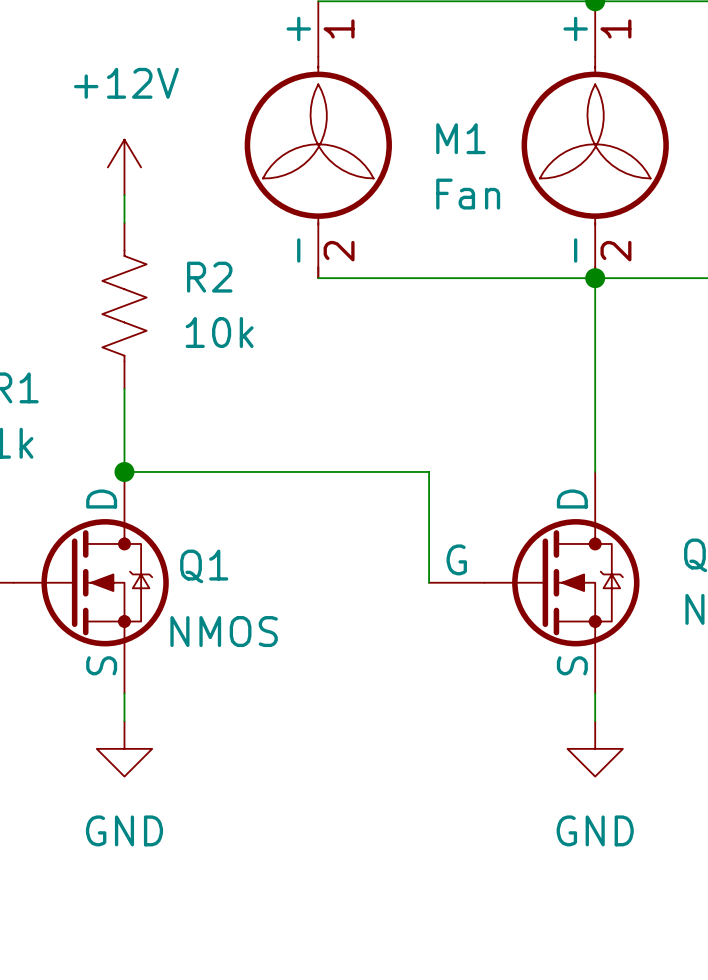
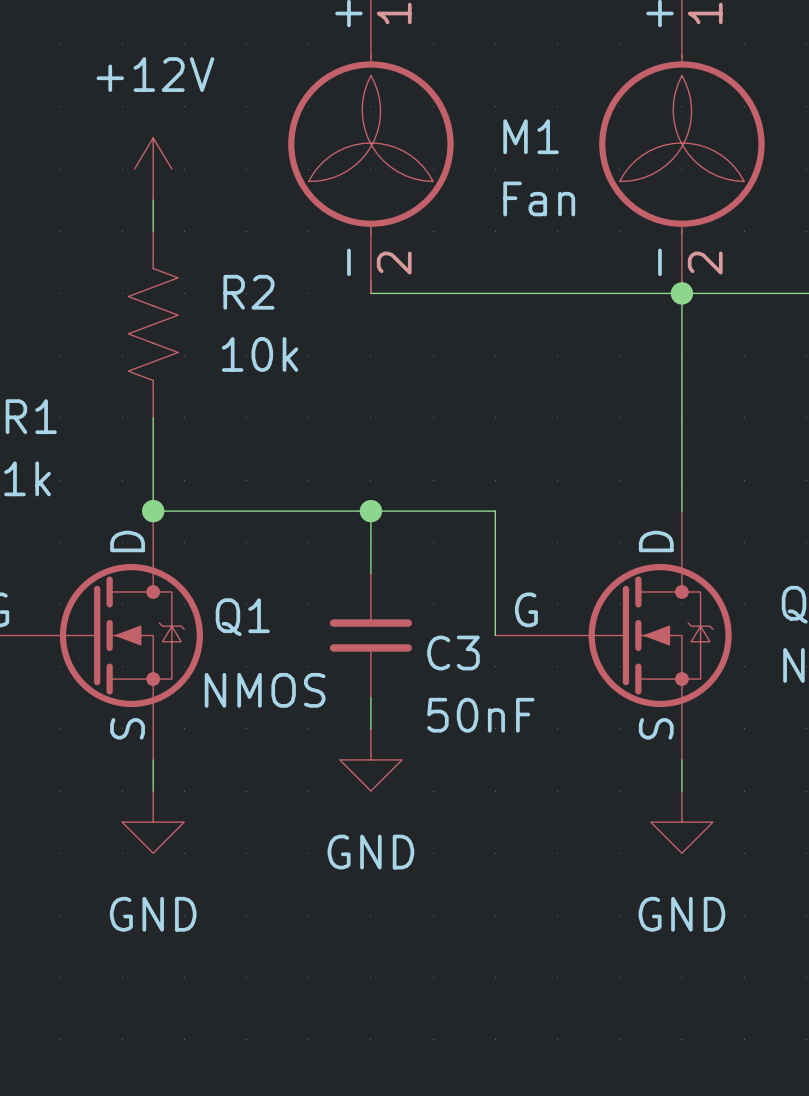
wire: none -> (370, 511) (370, 573)
junction: none -> (370, 511)
C3: none -> 50nF (370, 635)
wire: none -> (370, 697) (370, 728)
power symbol: none -> GND (370, 759)

